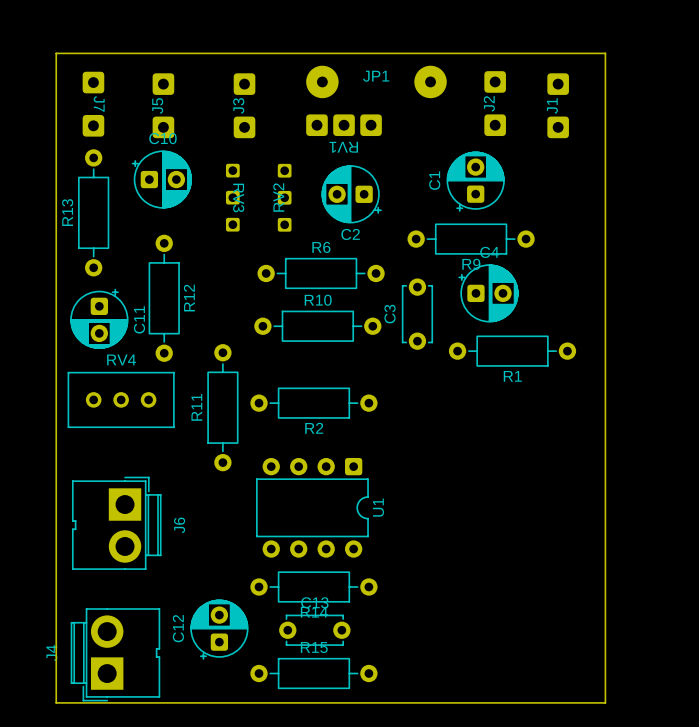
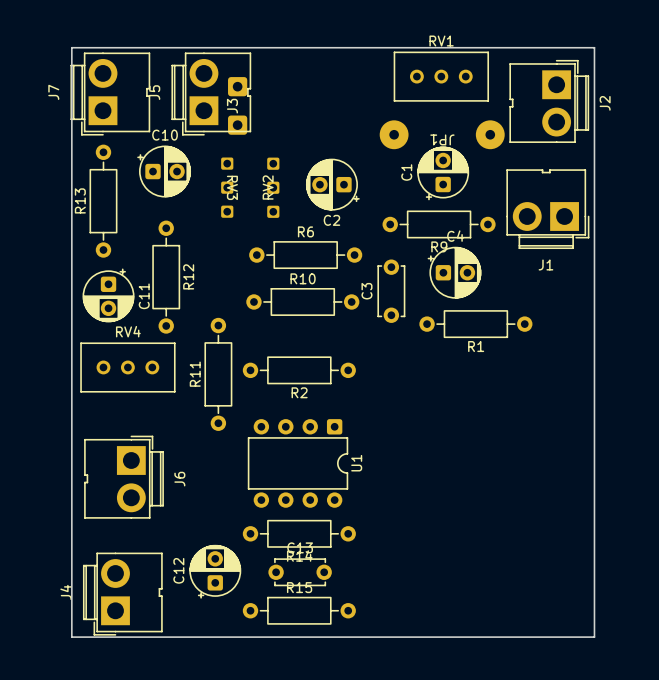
board edge: (56, 53) (605, 53) (605, 702) (56, 702) (56, 53) -> (71, 47) (71, 637) (594, 637) (594, 47) (71, 47)
J7 footprint: [82, 71, 105, 137] -> [70, 52, 151, 136]
J2 footprint: [484, 71, 506, 137] -> [509, 60, 589, 143]
J5 footprint: [152, 73, 175, 139] -> [171, 52, 251, 136]
J1 footprint: [547, 73, 569, 139] -> [506, 169, 590, 249]
JP1 name rotation: 0° (376, 76) -> 180° (442, 139)
JP1 position: (376, 81) -> (442, 134)
J7 name position: J7 (99, 103) -> J7 (53, 92)
J2 name position: J2 (489, 103) -> J2 (605, 103)
J5 name position: J5 (157, 105) -> J5 (154, 92)
J1 name position: J1 (552, 106) -> J1 (545, 264)
RV1 footprint: [306, 114, 382, 137] -> [393, 51, 489, 102]
RV1 name position: RV1 (343, 147) -> RV1 (441, 41)

